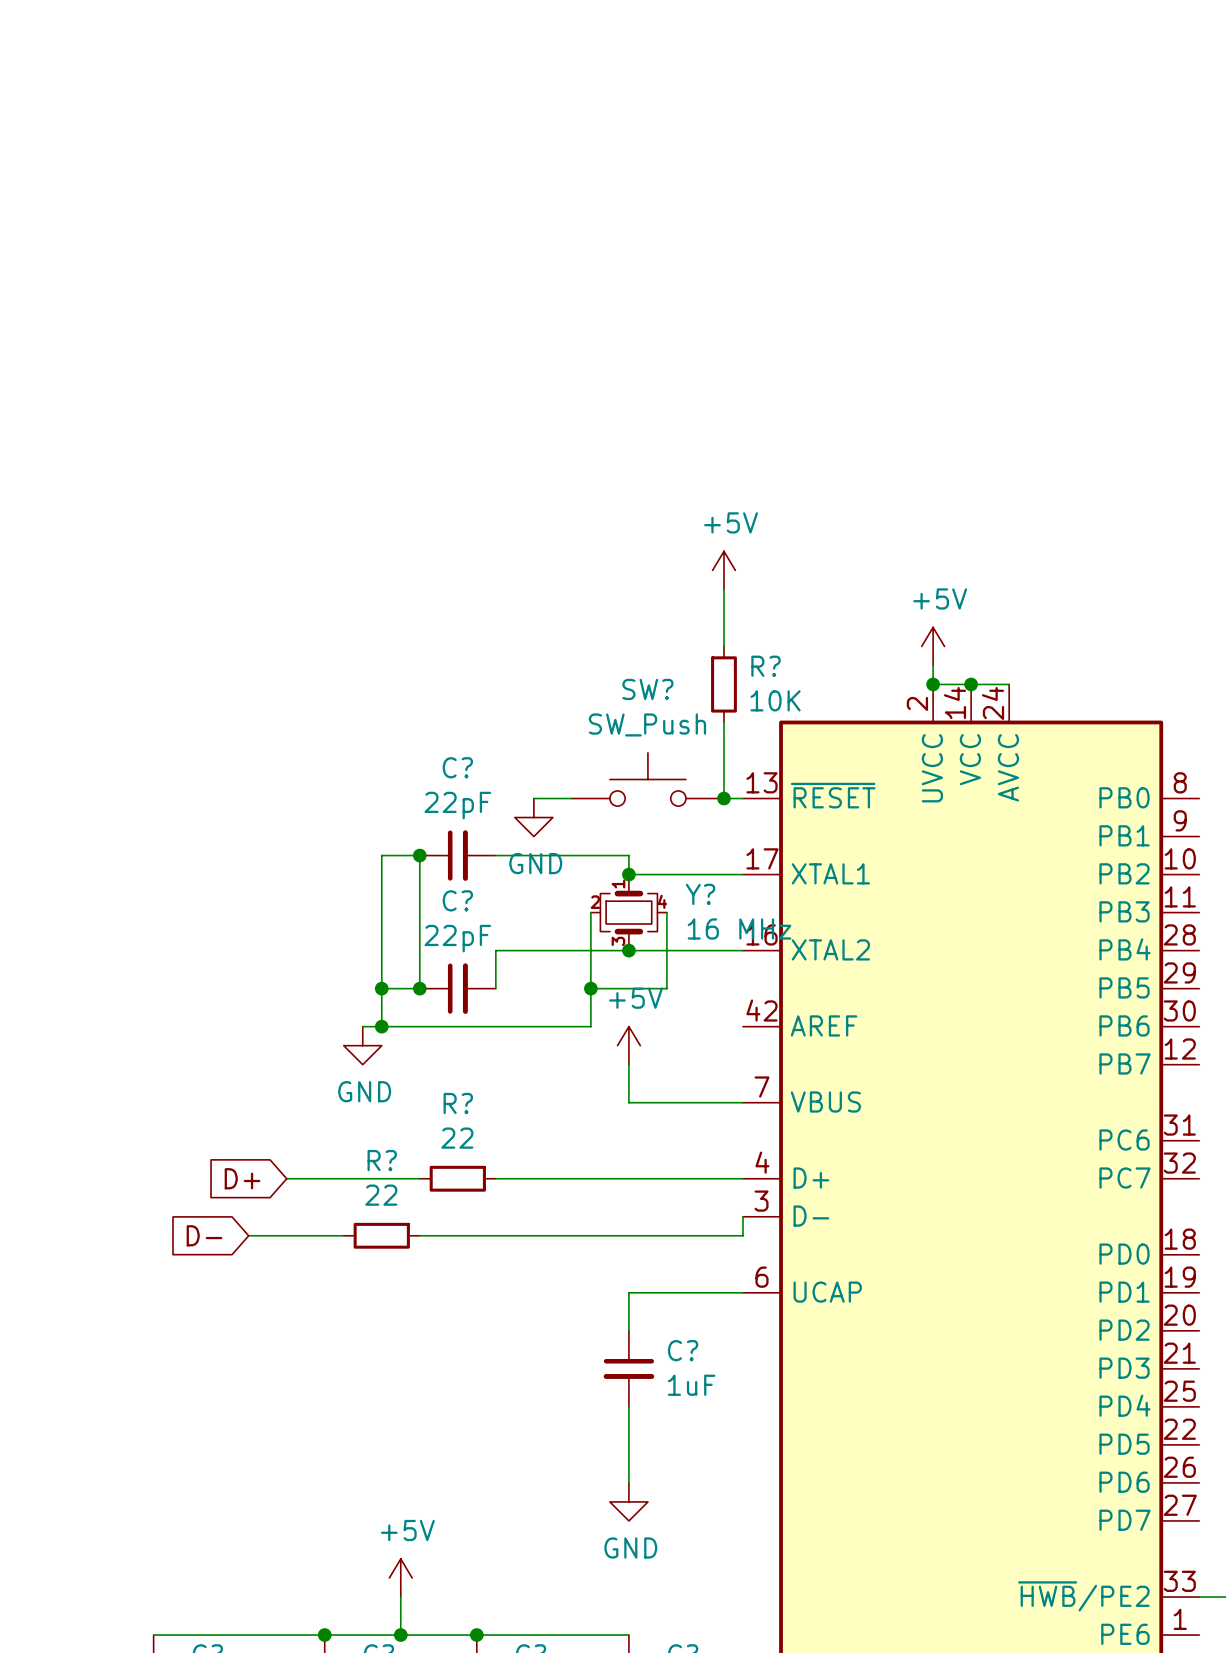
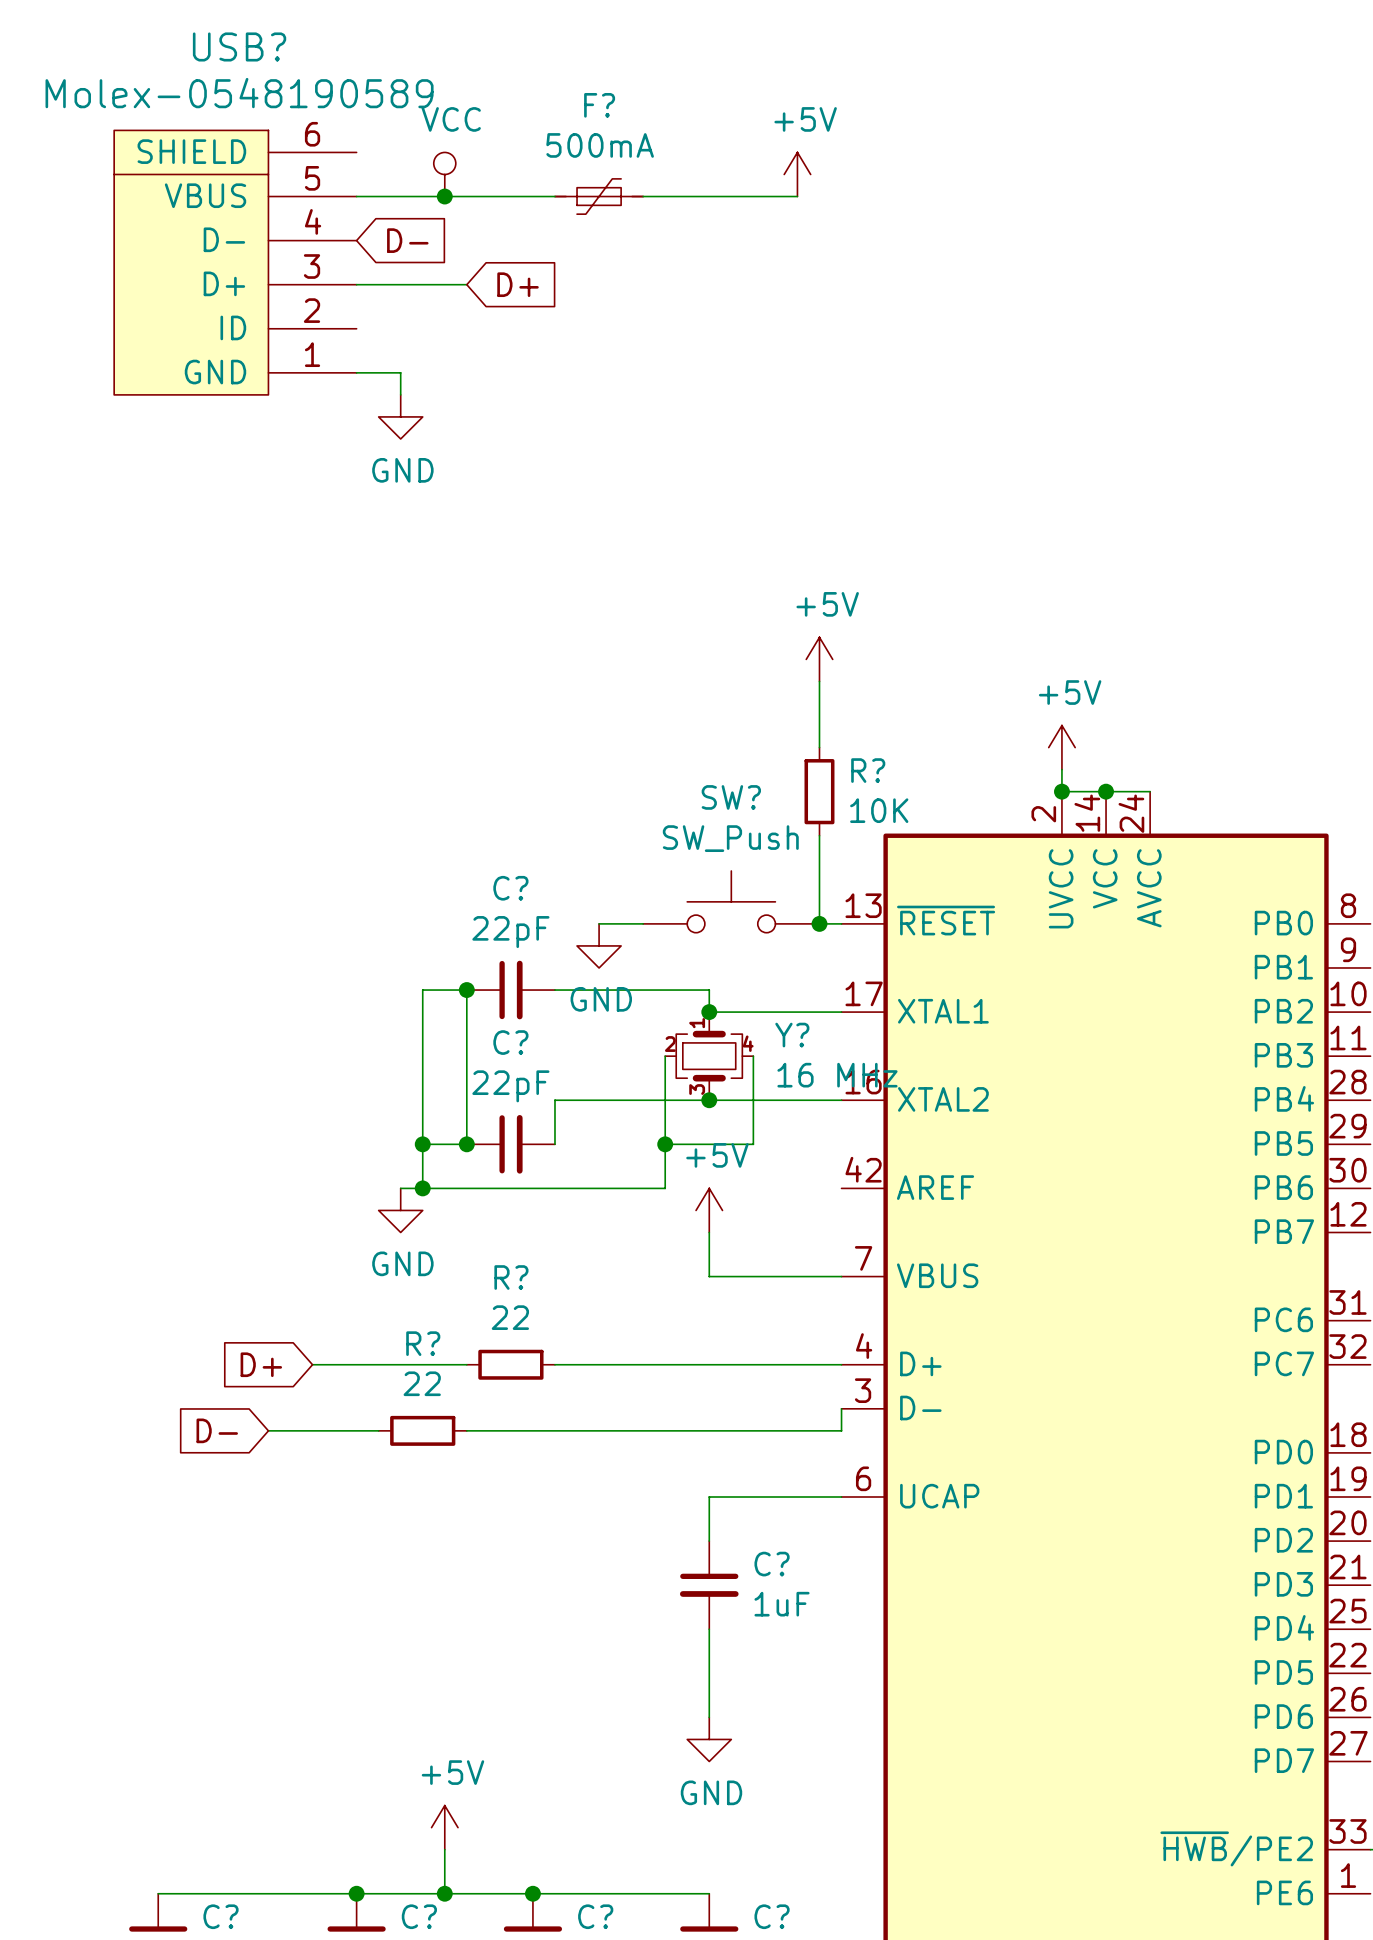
power symbol: none -> VCC (444, 174)
power symbol: none -> +5V (797, 174)
wire: none -> (356, 196) (554, 196)
junction: none -> (444, 196)
F?: none -> 500mA (599, 196)
wire: none -> (643, 196) (797, 196)
global label: none -> D- (407, 240)
USB?: none -> Molex-0548190589 (235, 262)
wire: none -> (356, 284) (466, 284)
global label: none -> D+ (518, 284)
wire: none -> (356, 372) (400, 372) (400, 394)
power symbol: none -> GND (400, 416)

